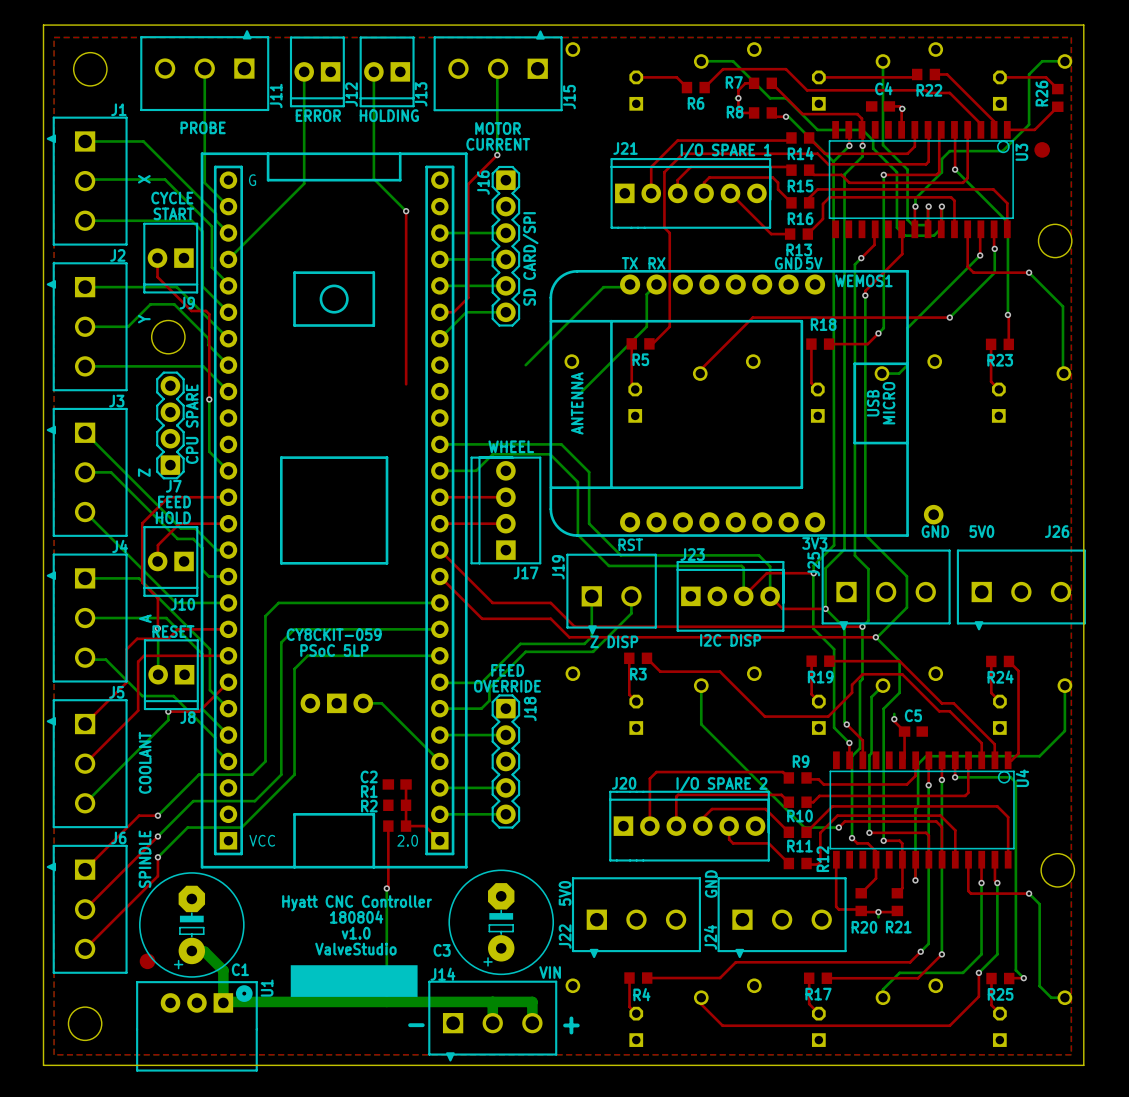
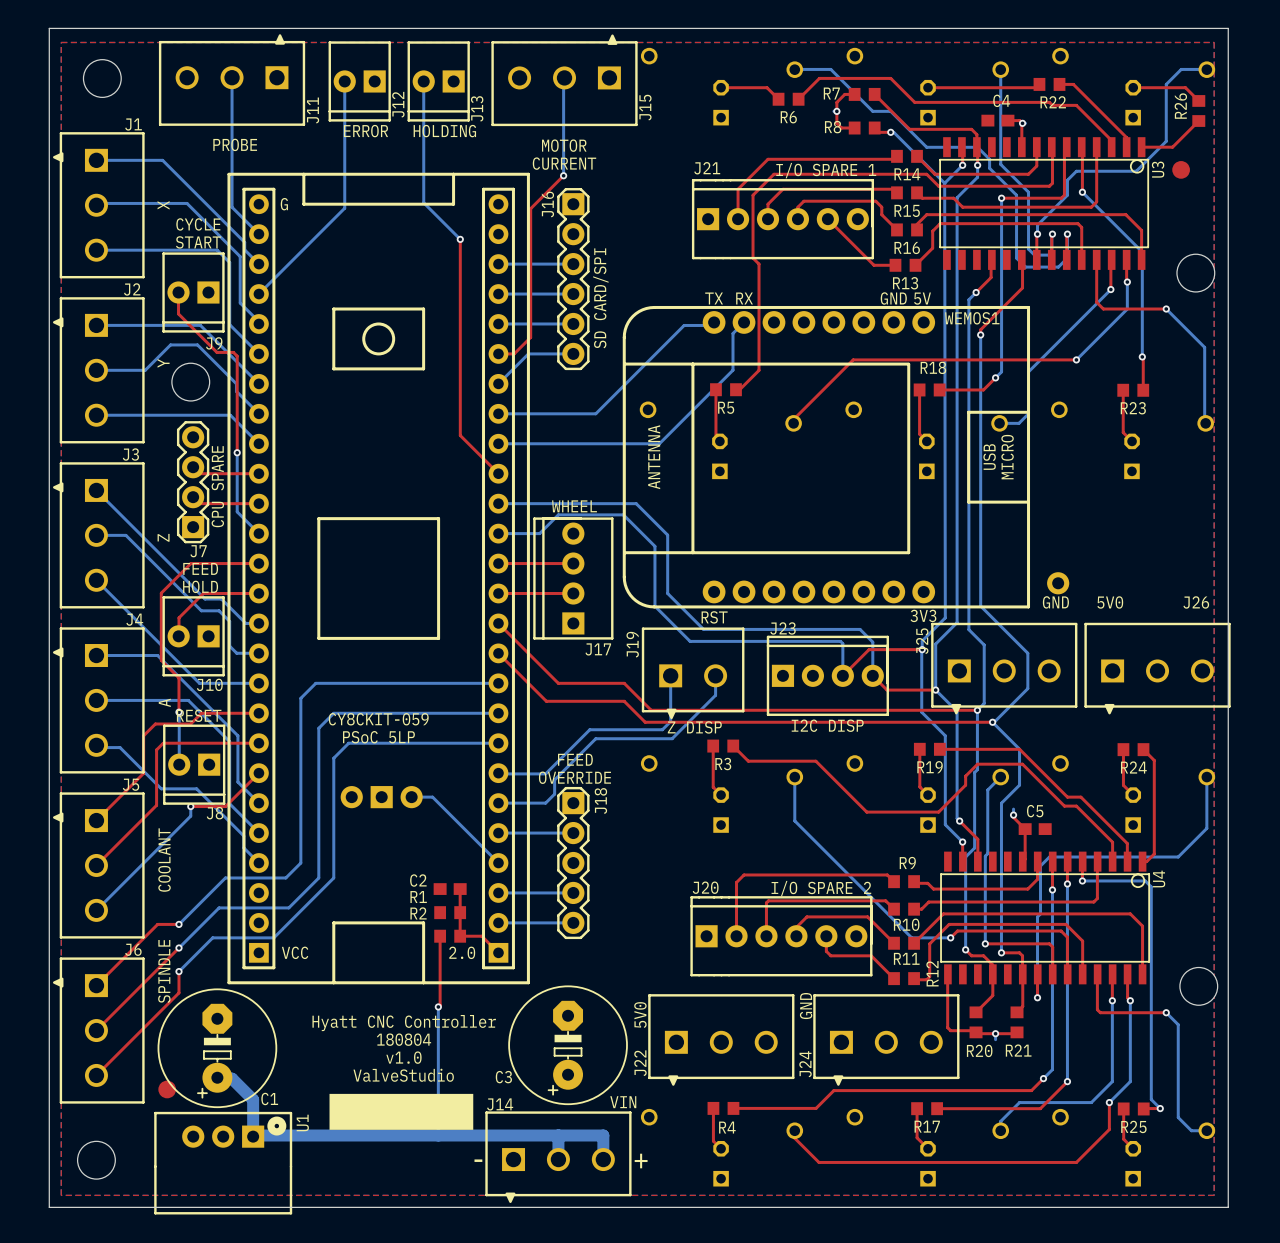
bottom track: none -> (498, 413) (595, 413)
top track: none -> (460, 435) (498, 473)
bottom track: none -> (498, 443) (659, 443)
top track: none -> (193, 467) (199, 473) (258, 473)
top track: none -> (193, 497) (199, 503) (258, 503)

